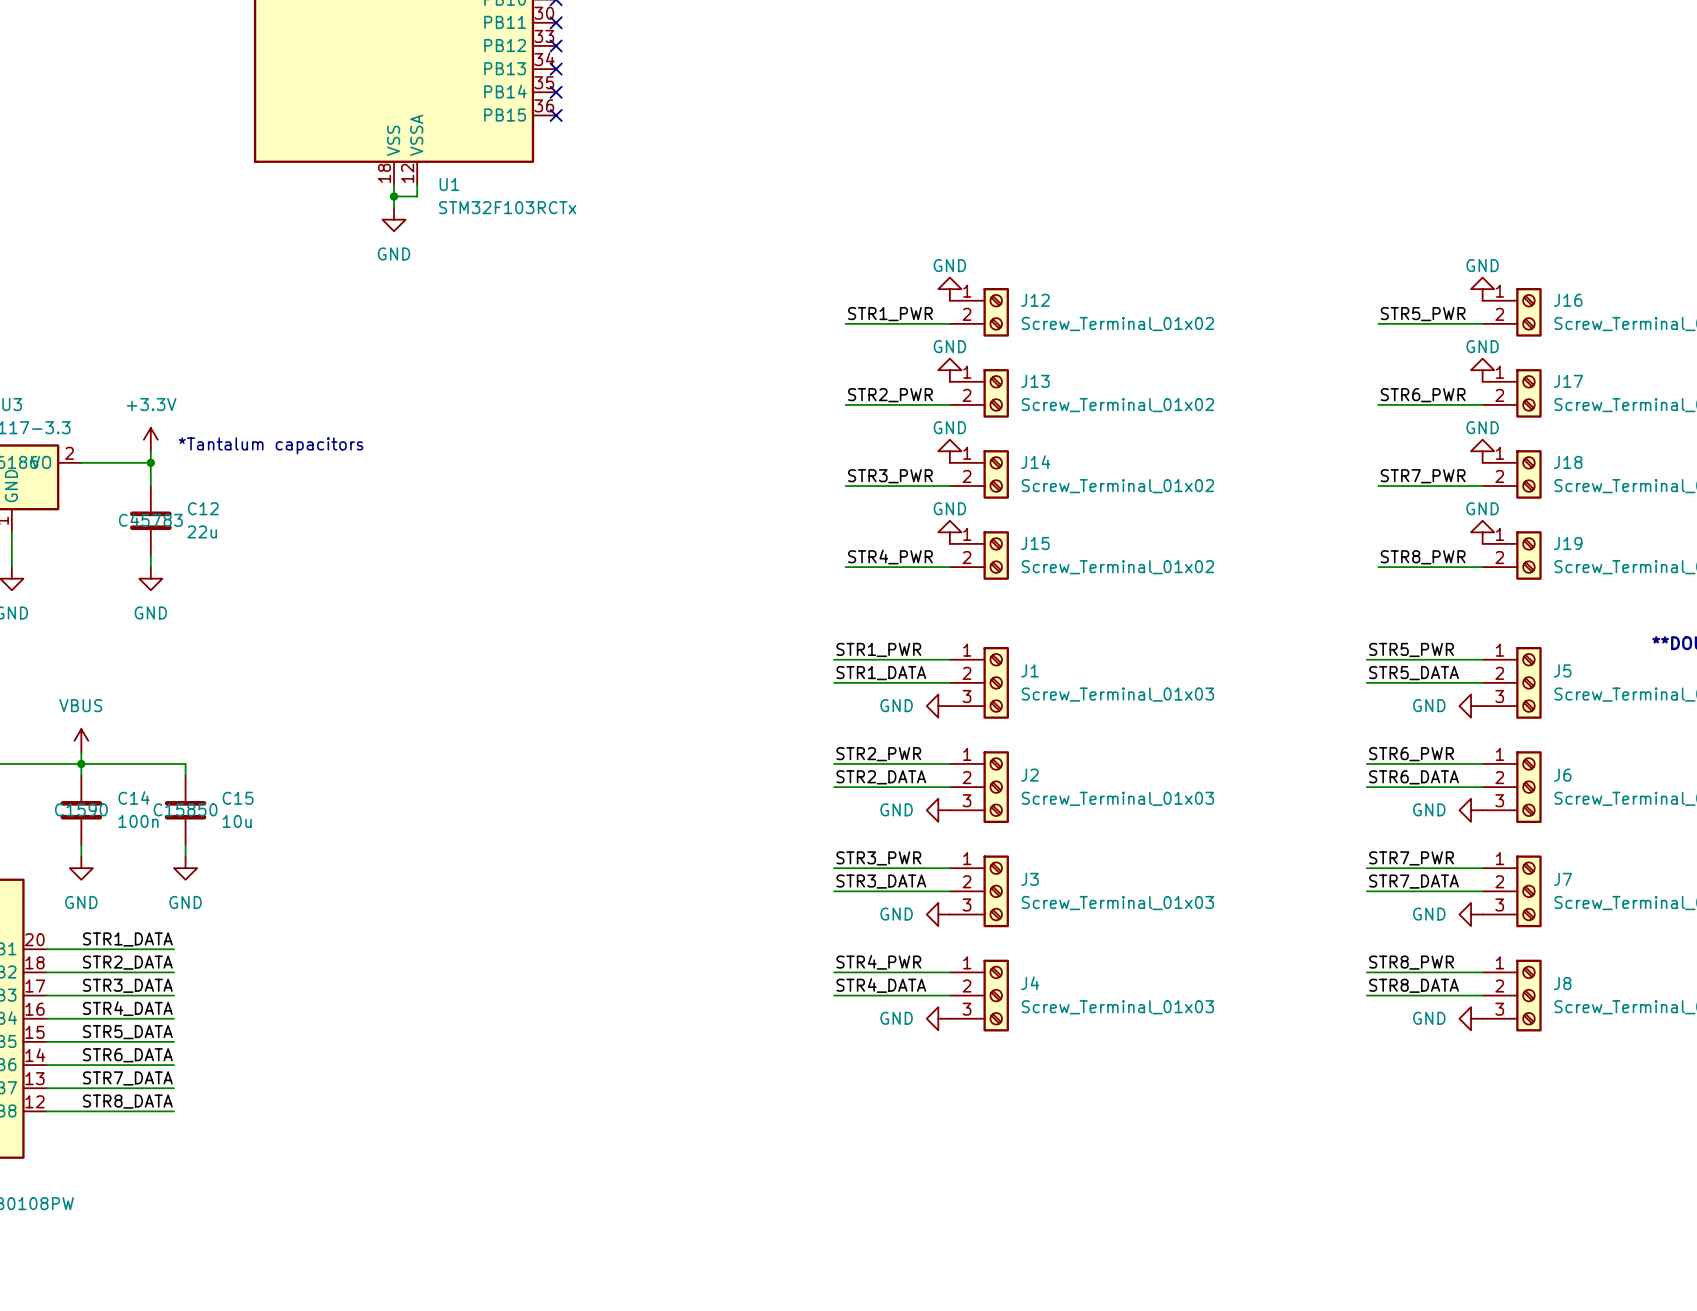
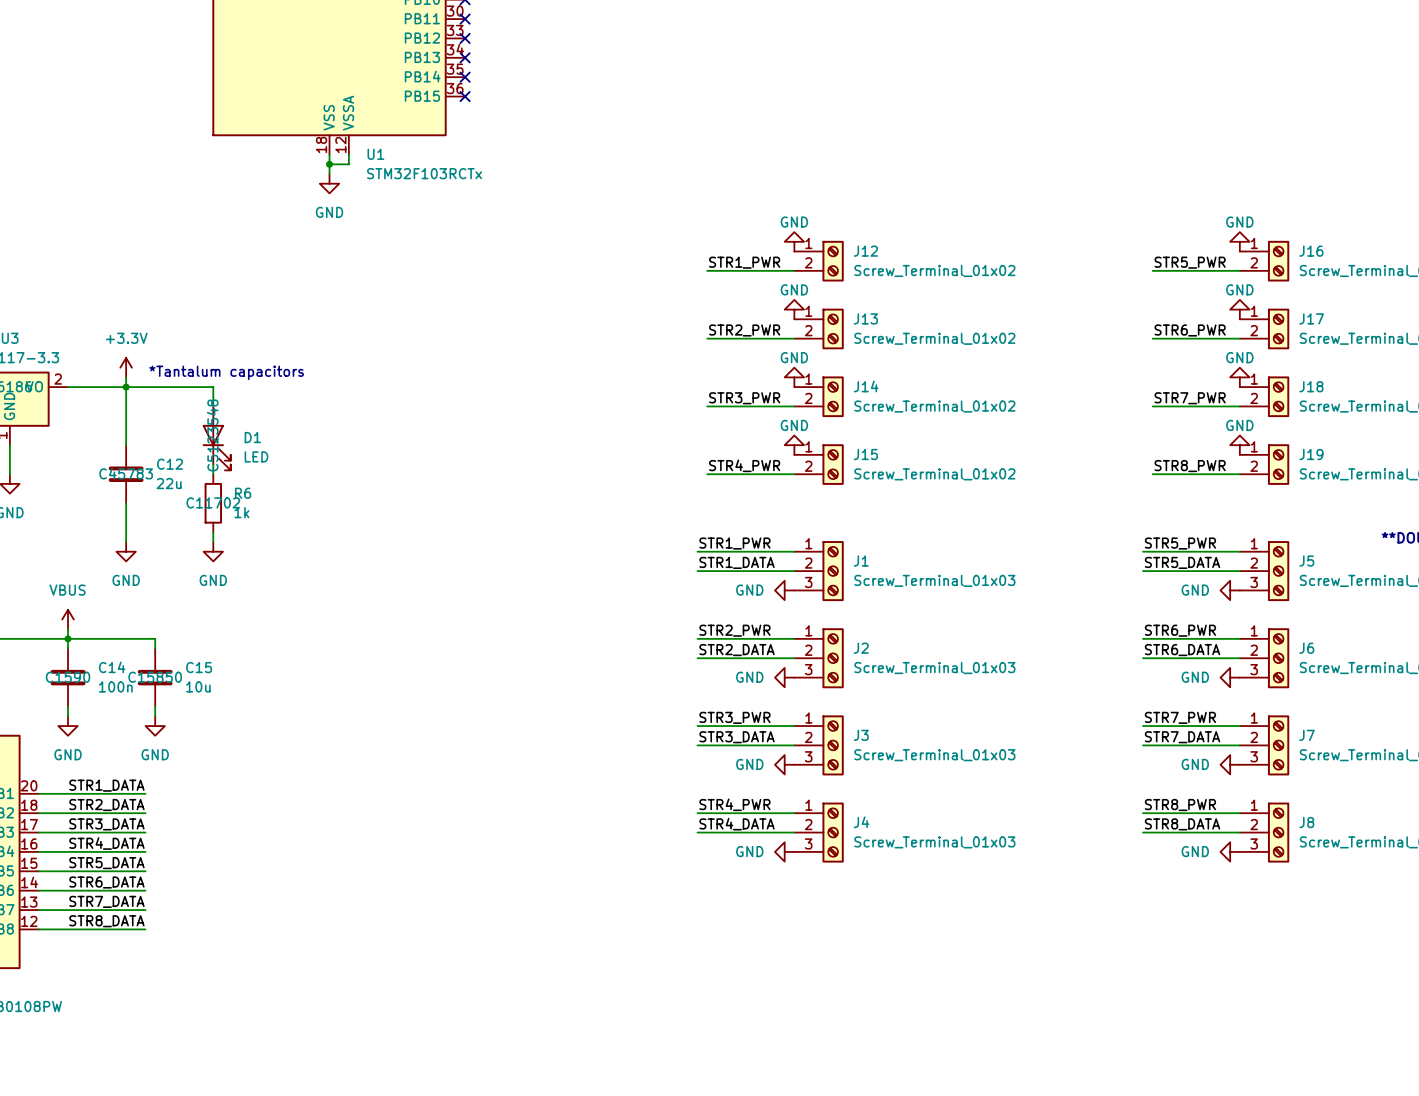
wire: none -> (126, 387) (213, 387) (213, 406)
C12 position: (150, 520) -> (126, 474)
D1: none -> LED (216, 438)
power symbol: GND (150, 578) -> none
wire: none -> (126, 503) (126, 542)
R6: none -> 1k (213, 503)
wire: none -> (213, 532) (213, 542)
power symbol: none -> GND (126, 551)
power symbol: none -> GND (213, 551)

